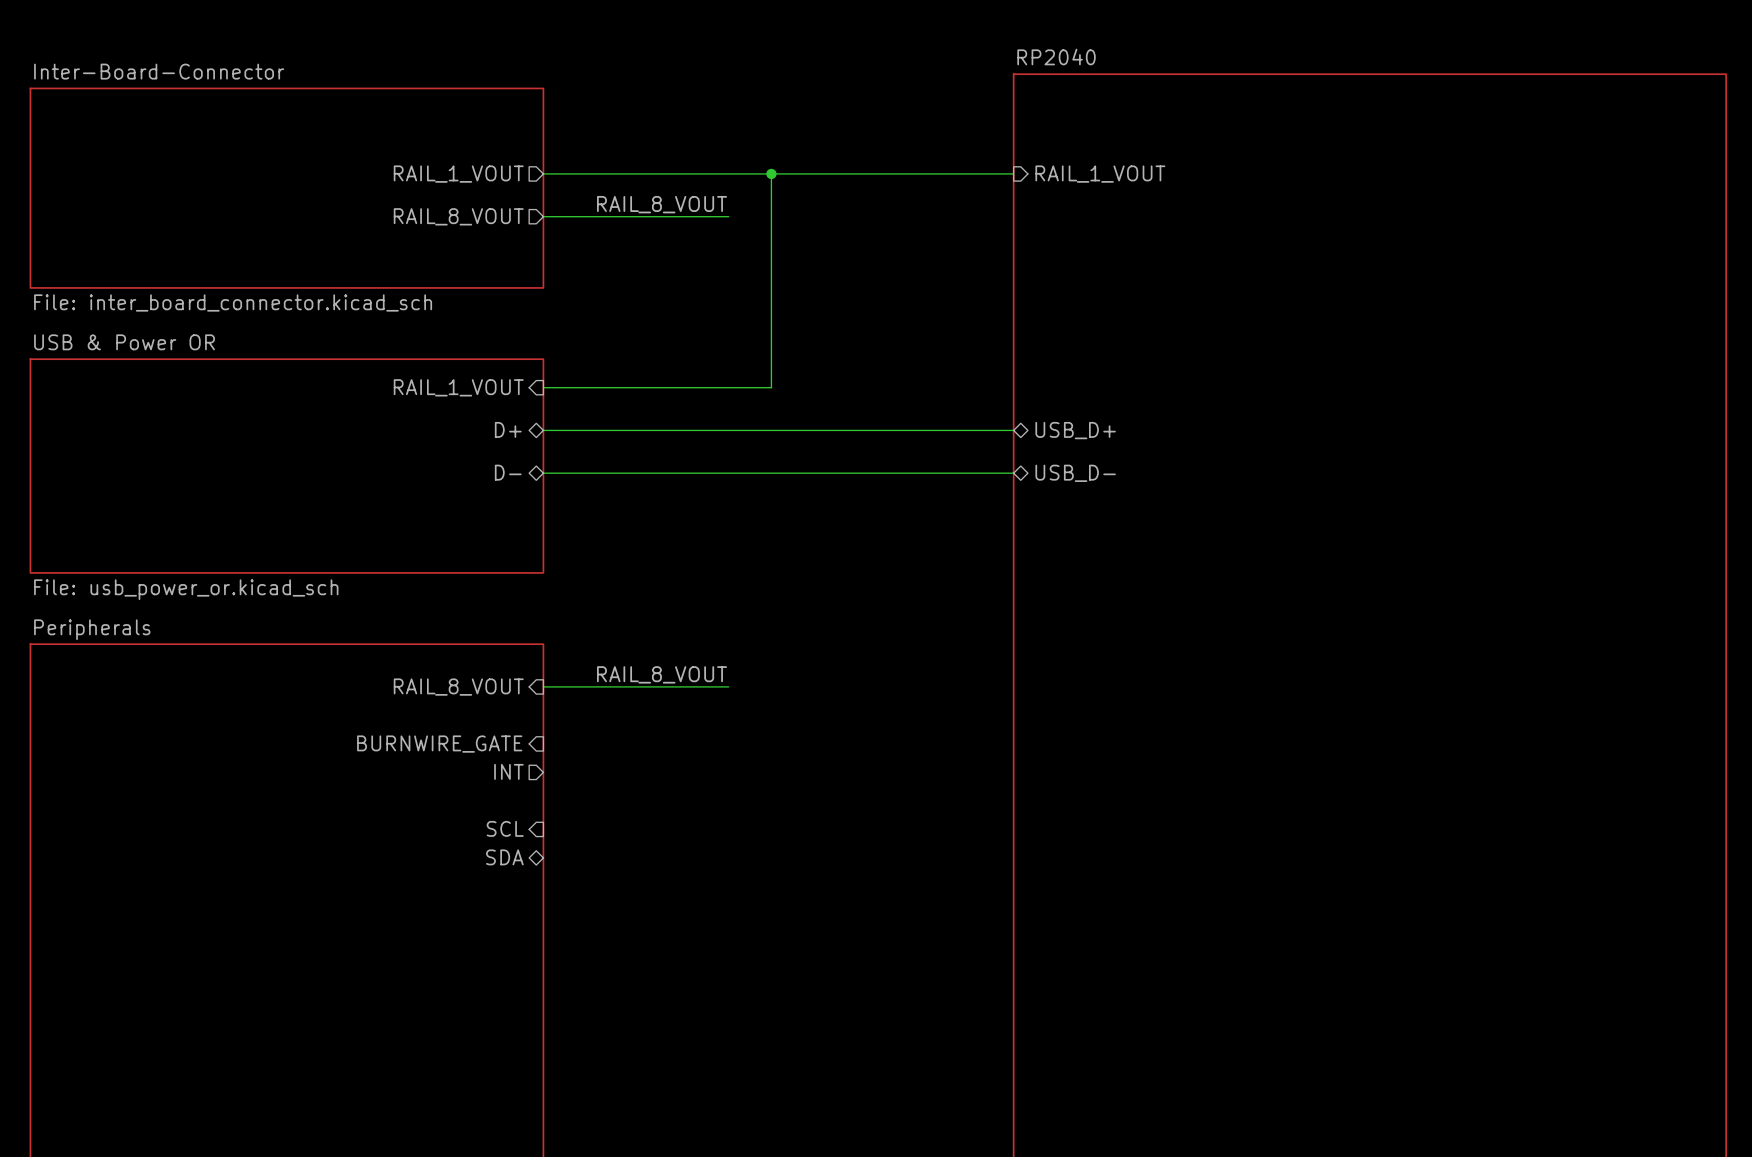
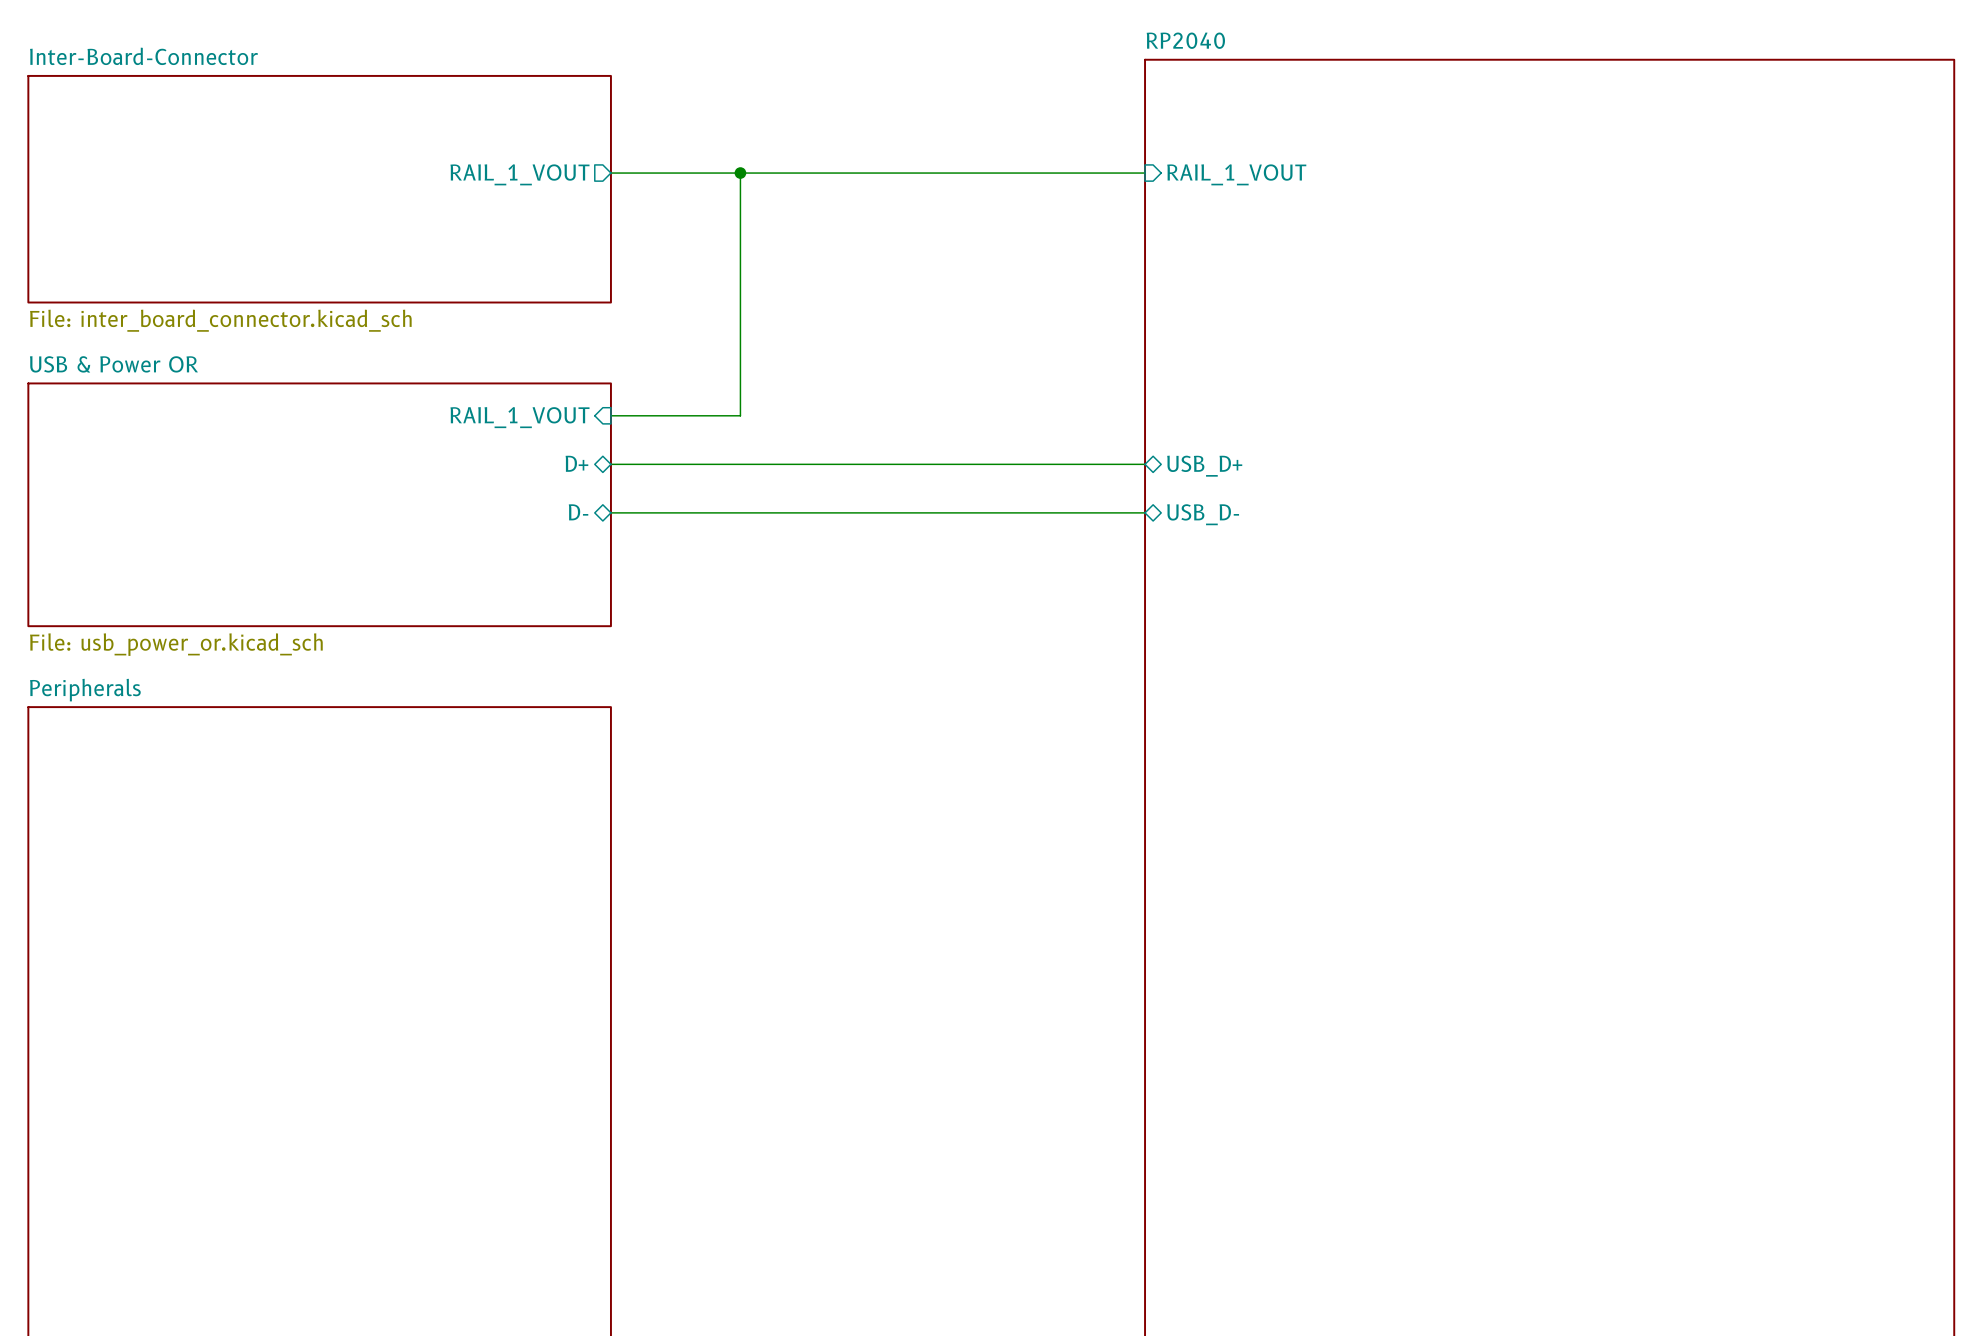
junction: none -> (740, 173)
wire: (771, 173) (771, 387) (657, 387) -> (740, 173) (740, 415)
junction: (771, 173) -> none
label: RAIL_8_VOUT (662, 204) -> none
sheet pin: RAIL_8_VOUT (458, 216) -> none
wire: (543, 216) (728, 216) -> none
label: RAIL_8_VOUT (662, 674) -> none
wire: (543, 686) (728, 686) -> none
sheet pin: RAIL_8_VOUT (458, 687) -> none
sheet pin: BURNWIRE_GATE (439, 744) -> none
sheet pin: INT (508, 771) -> none
sheet pin: SCL (505, 828) -> none
sheet pin: SDA (504, 857) -> none

